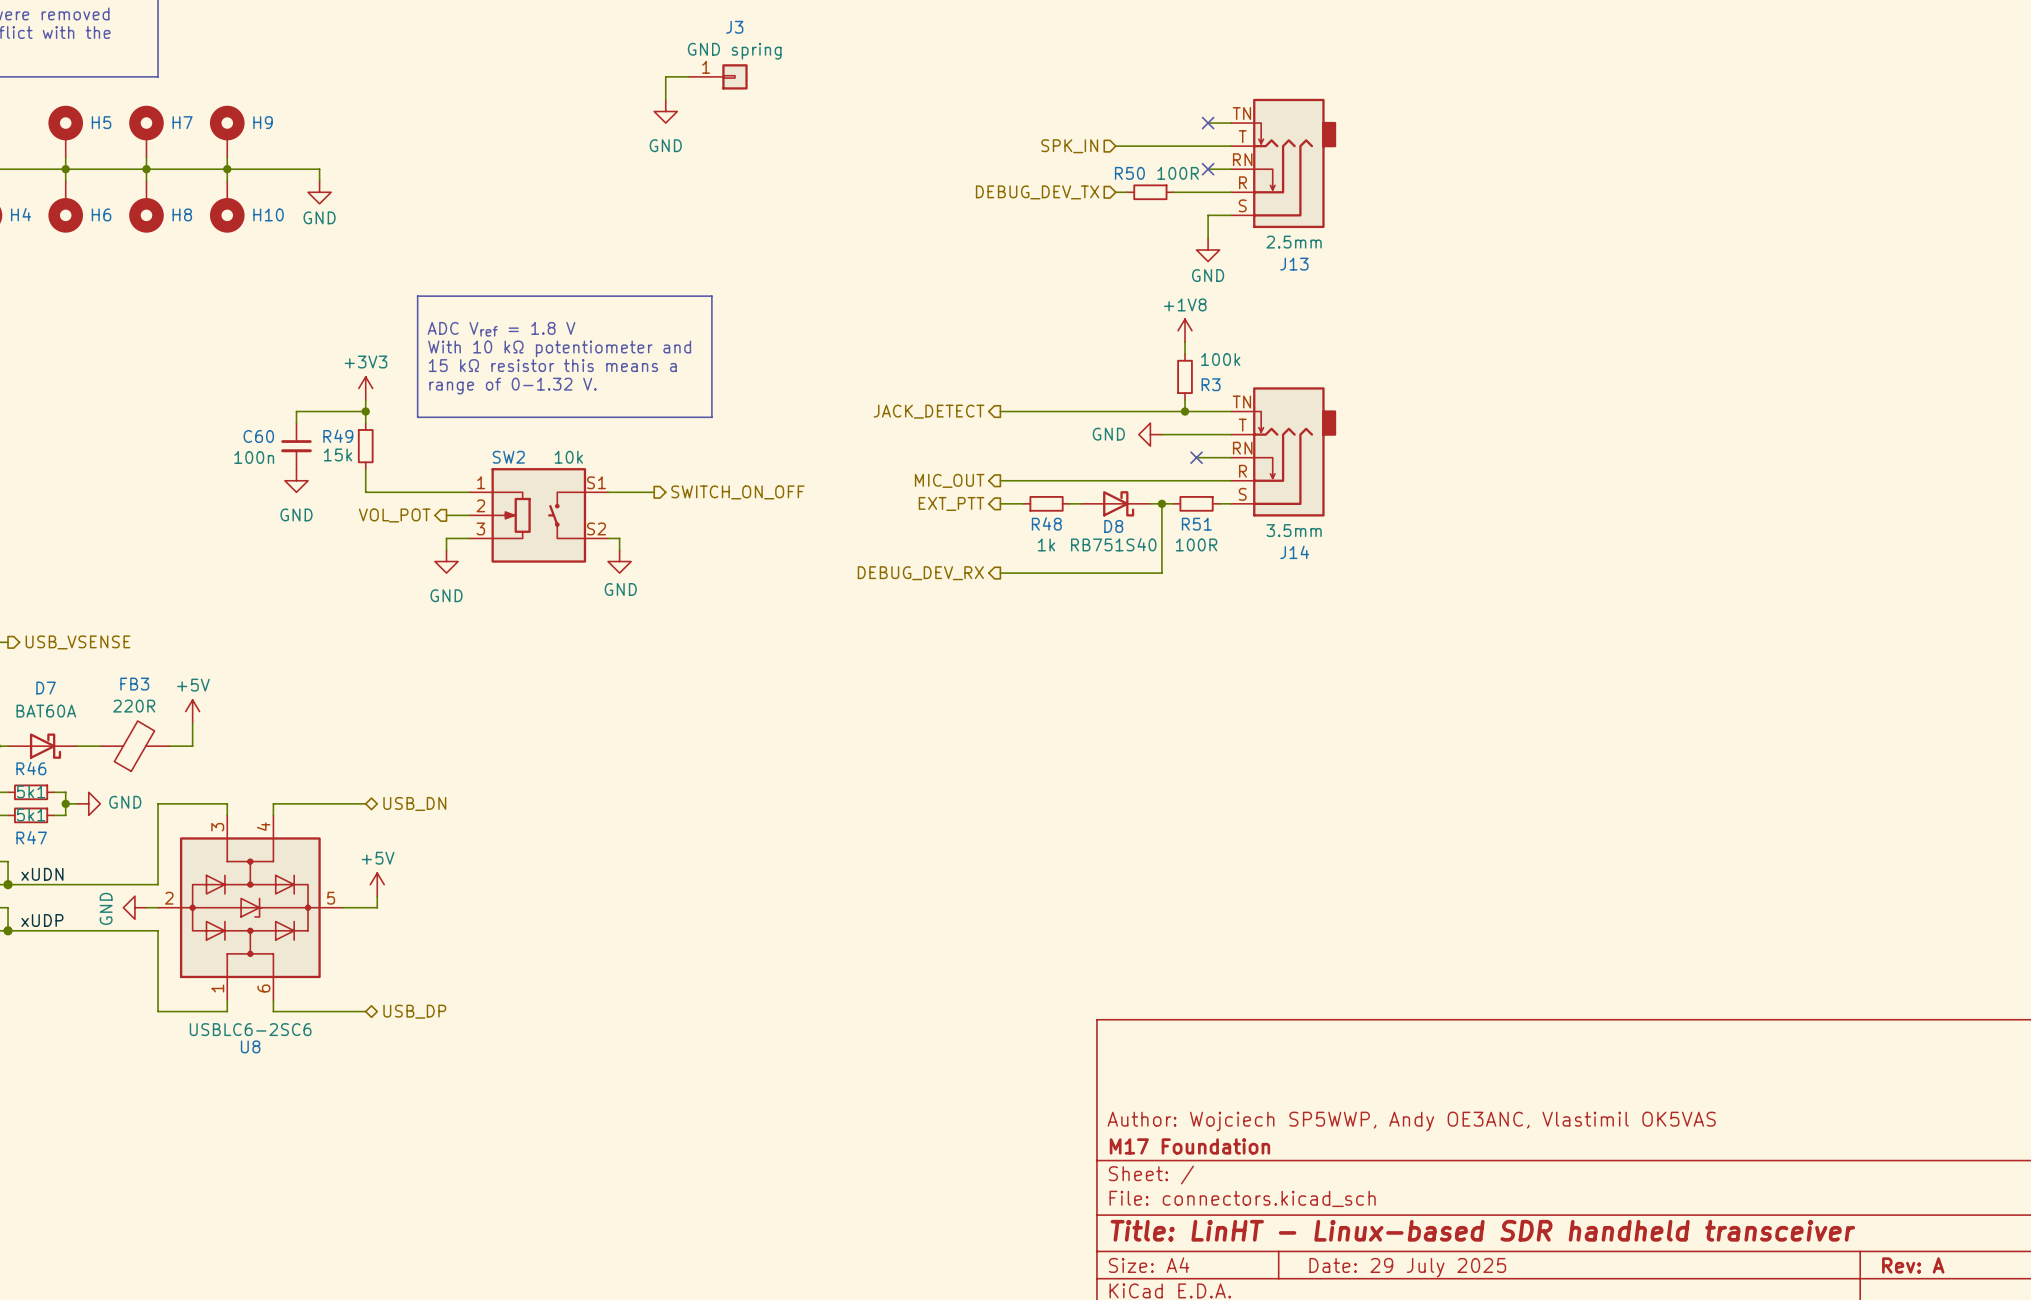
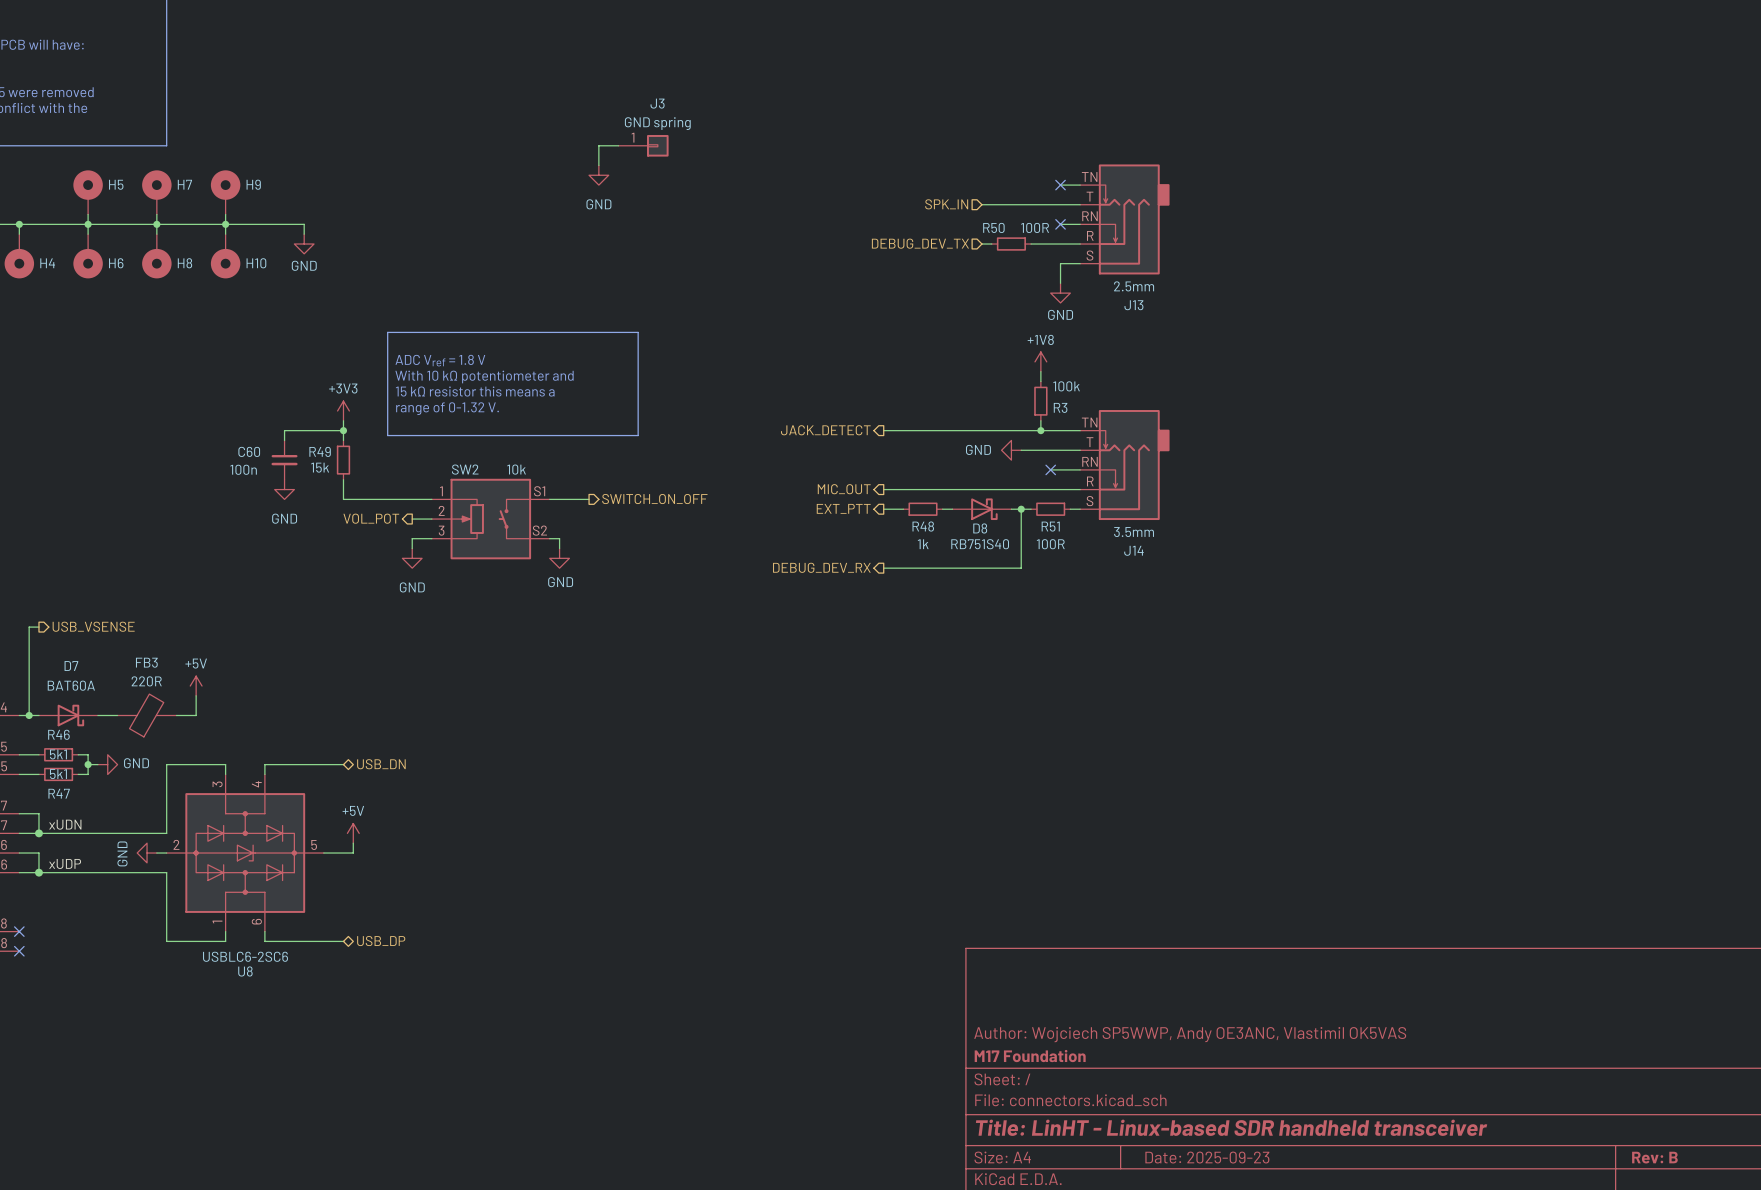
title block: Rev: A (1913, 1265) -> Rev: B (1654, 1157)
title block: Date: 29 July 2025 (1407, 1267) -> Date: 2025-09-23 (1207, 1157)

